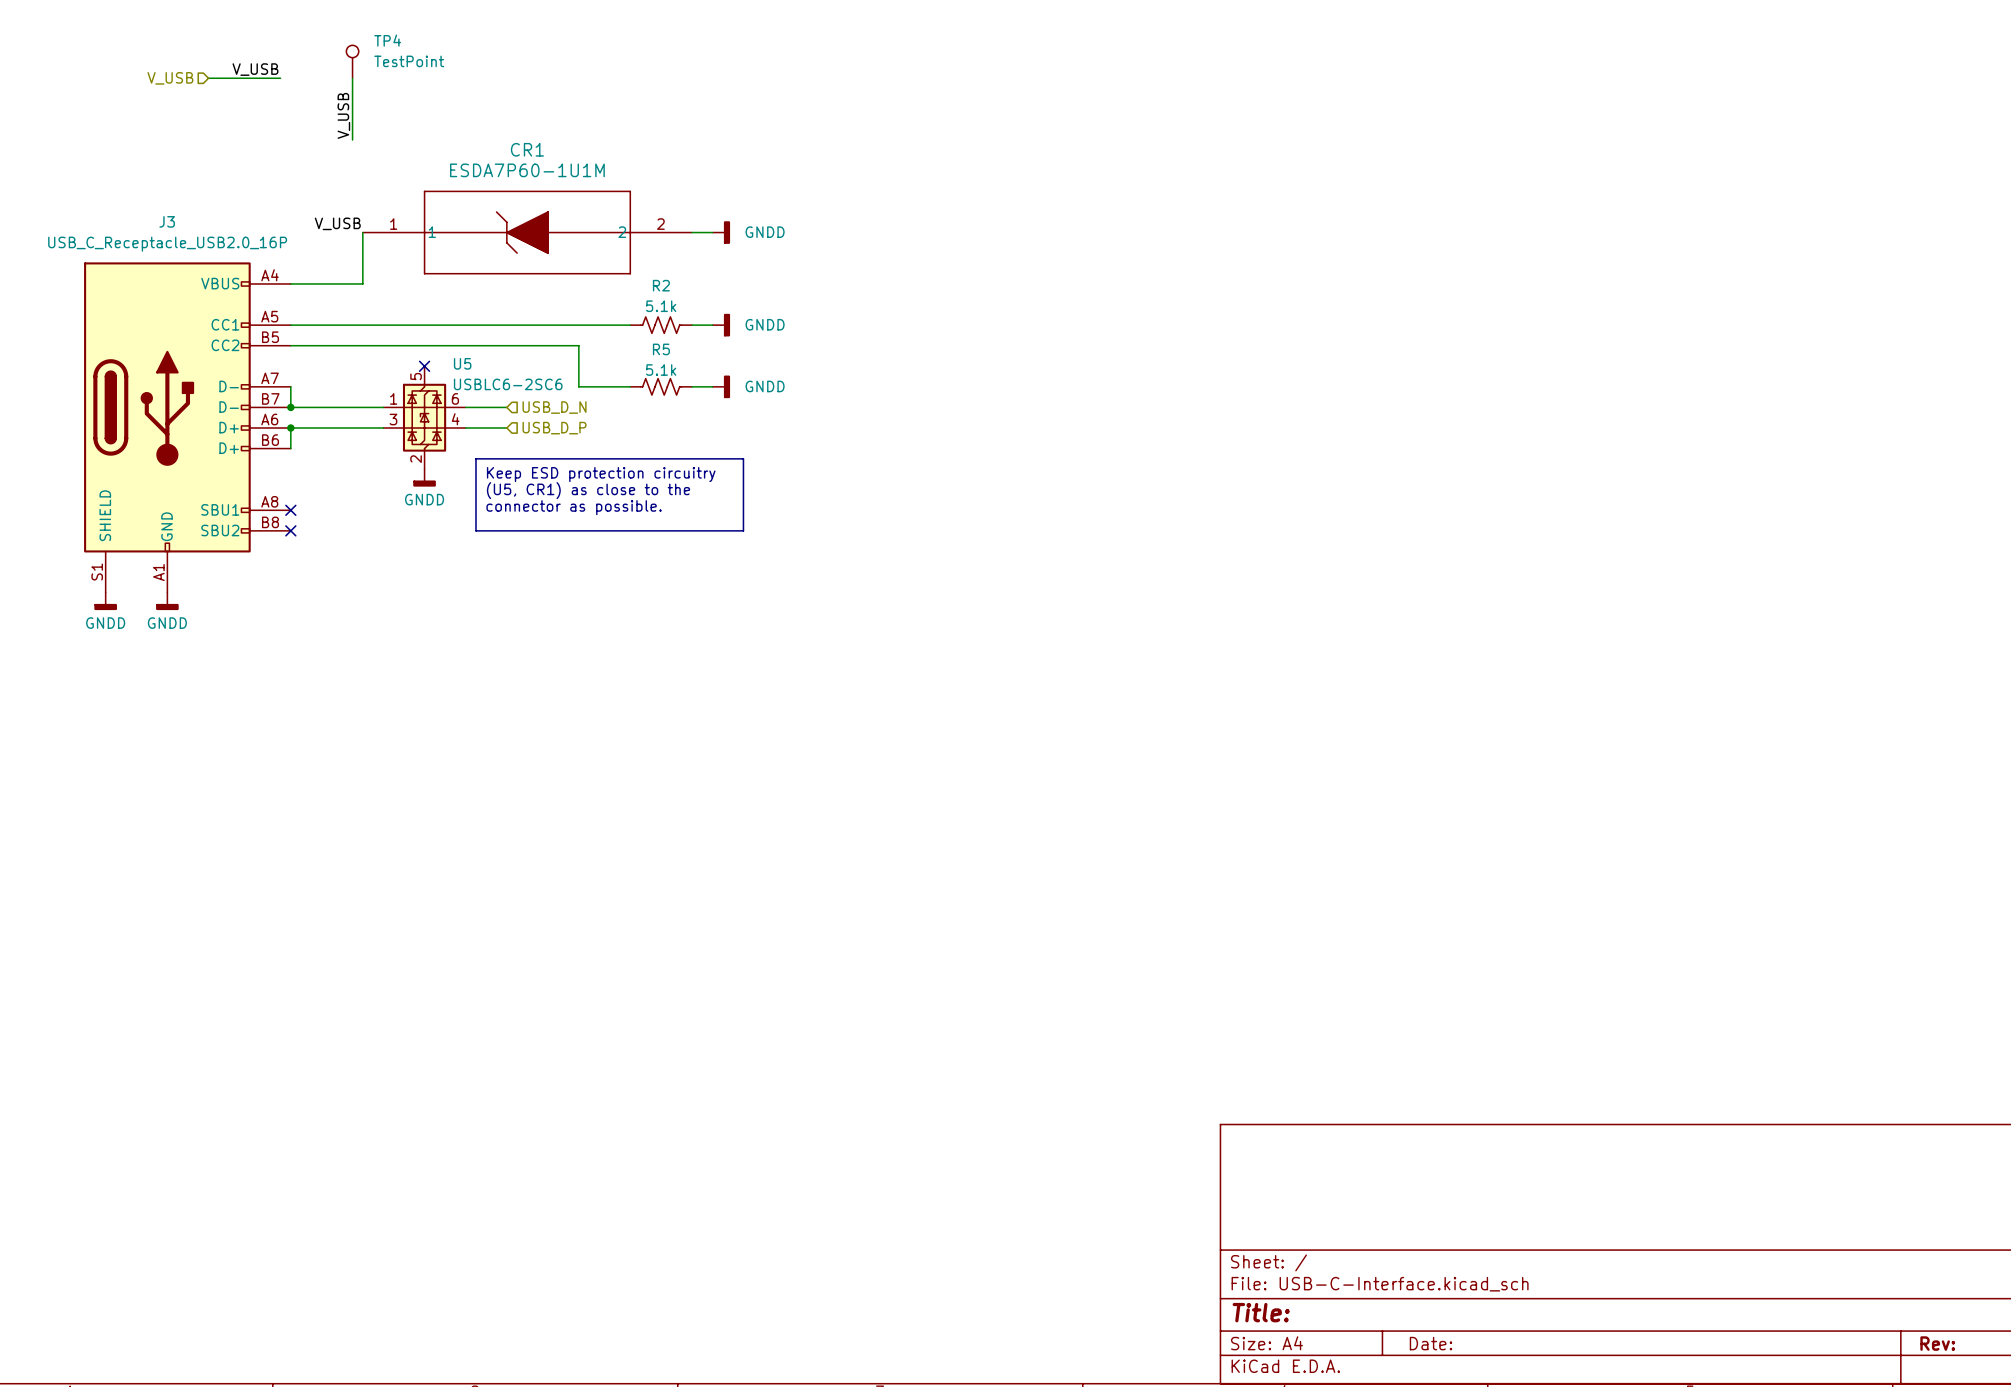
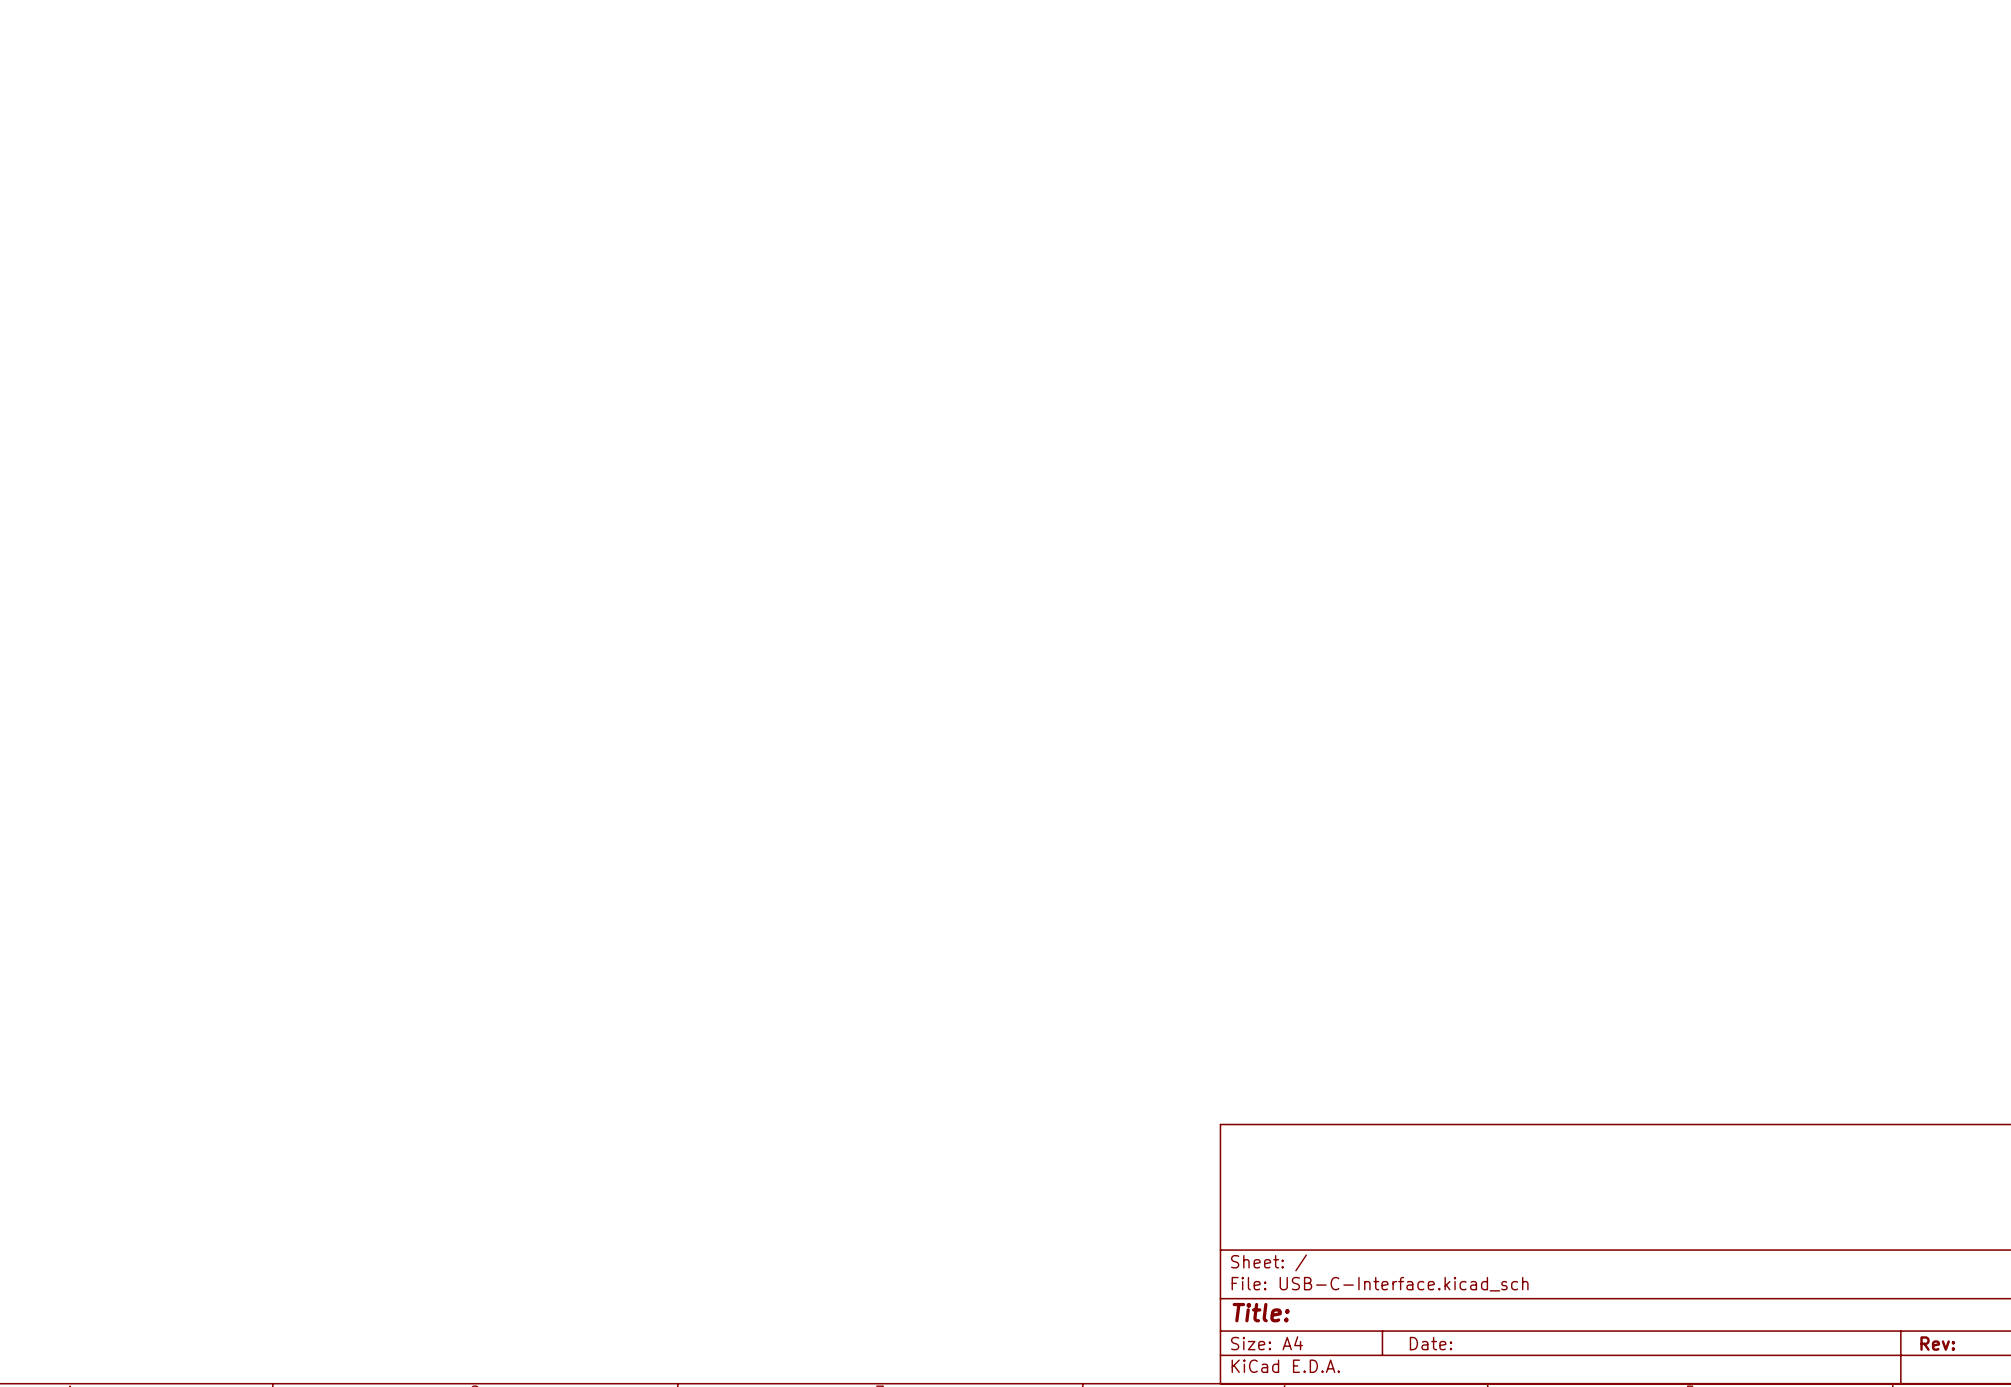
TP4: TestPoint (352, 61) -> none
label: V_USB (255, 69) -> none
hierarchical label: V_USB (170, 78) -> none
wire: (208, 78) (280, 78) -> none
wire: (352, 78) (352, 139) -> none
label: V_USB (343, 115) -> none
label: V_USB (337, 223) -> none
wire: (362, 232) (362, 283) (290, 283) -> none
CR1: ESDA7P60-1U1M (527, 232) -> none
wire: (692, 232) (712, 232) -> none
power symbol: GNDD (721, 232) -> none
wire: (290, 325) (630, 325) -> none
R2: 5.1k (661, 325) -> none
wire: (692, 325) (712, 325) -> none
power symbol: GNDD (721, 325) -> none
wire: (290, 345) (578, 345) (578, 386) (630, 386) -> none
no-connect mark: (424, 366) -> none
wire: (290, 386) (290, 407) (383, 407) -> none
R5: 5.1k (661, 386) -> none
wire: (692, 386) (712, 386) -> none
power symbol: GNDD (721, 386) -> none
junction: (290, 407) -> none
wire: (465, 407) (506, 407) -> none
hierarchical label: USB_D_N (554, 407) -> none
U5: USBLC6-2SC6 (424, 417) -> none
J3: USB_C_Receptacle_USB2.0_16P (187, 427) -> none
junction: (290, 428) -> none
wire: (383, 428) (290, 428) (290, 448) -> none
wire: (465, 428) (506, 428) -> none
hierarchical label: USB_D_P (554, 428) -> none
line: (475, 458) (743, 458) (743, 530) (475, 530) (475, 458) -> none
text: Keep ESD protection circuitry (601, 474) -> none
power symbol: GNDD (424, 477) -> none
text: (U5, CR1) as close to the (588, 490) -> none
text: connector as possible. (574, 507) -> none
no-connect mark: (290, 510) -> none
no-connect mark: (290, 530) -> none
power symbol: GNDD (105, 601) -> none
power symbol: GNDD (167, 601) -> none

